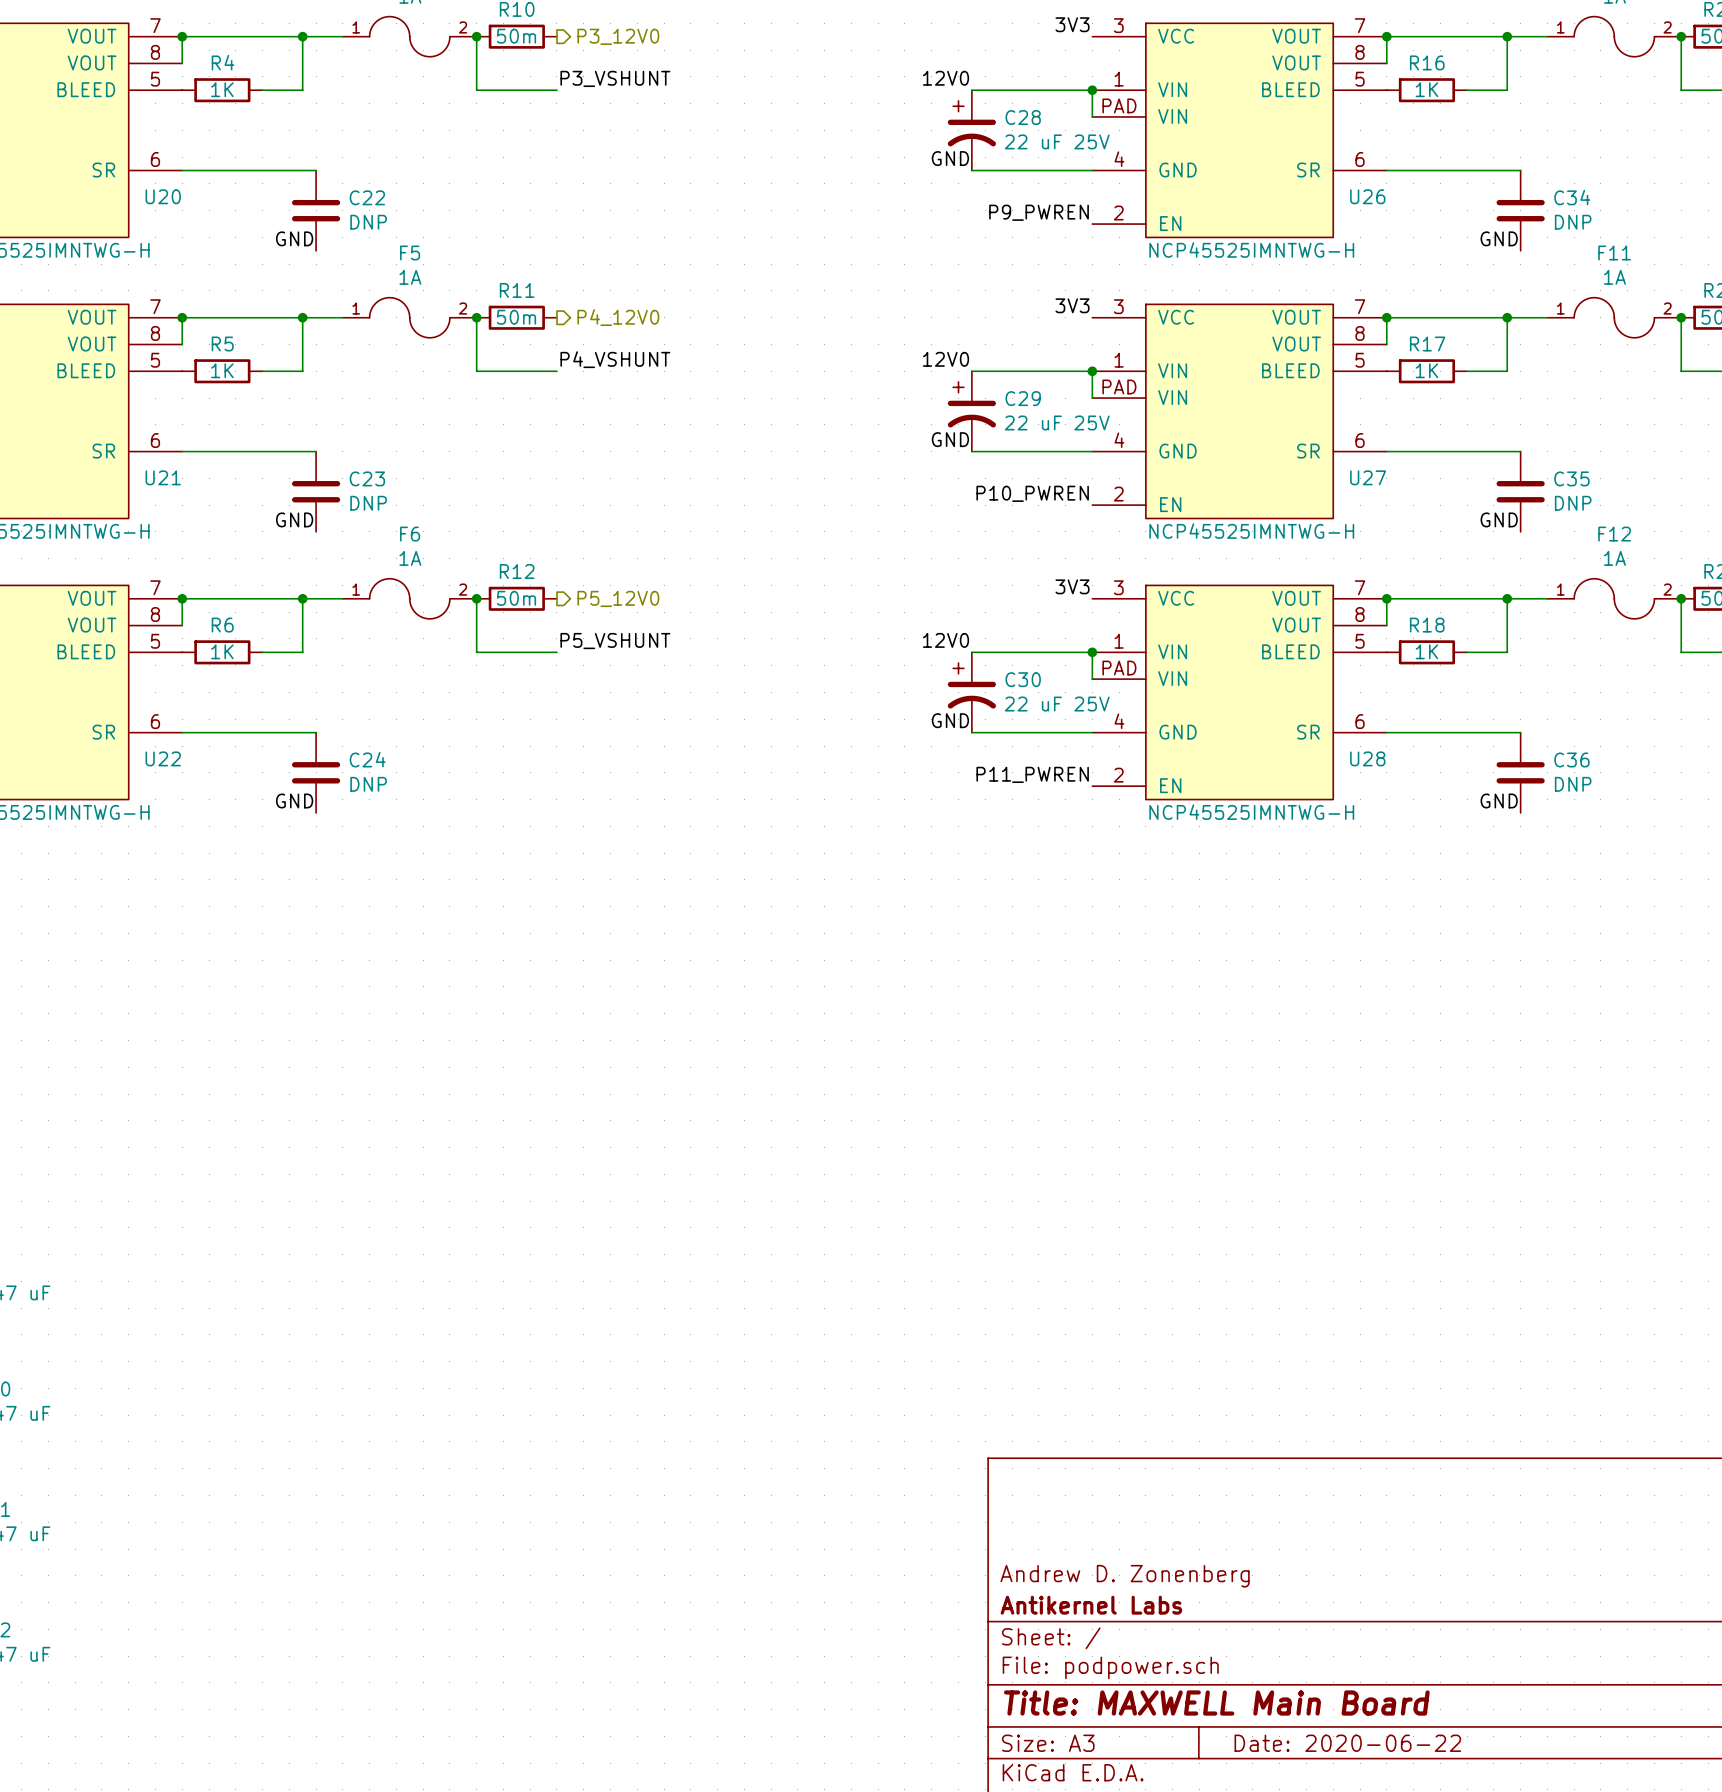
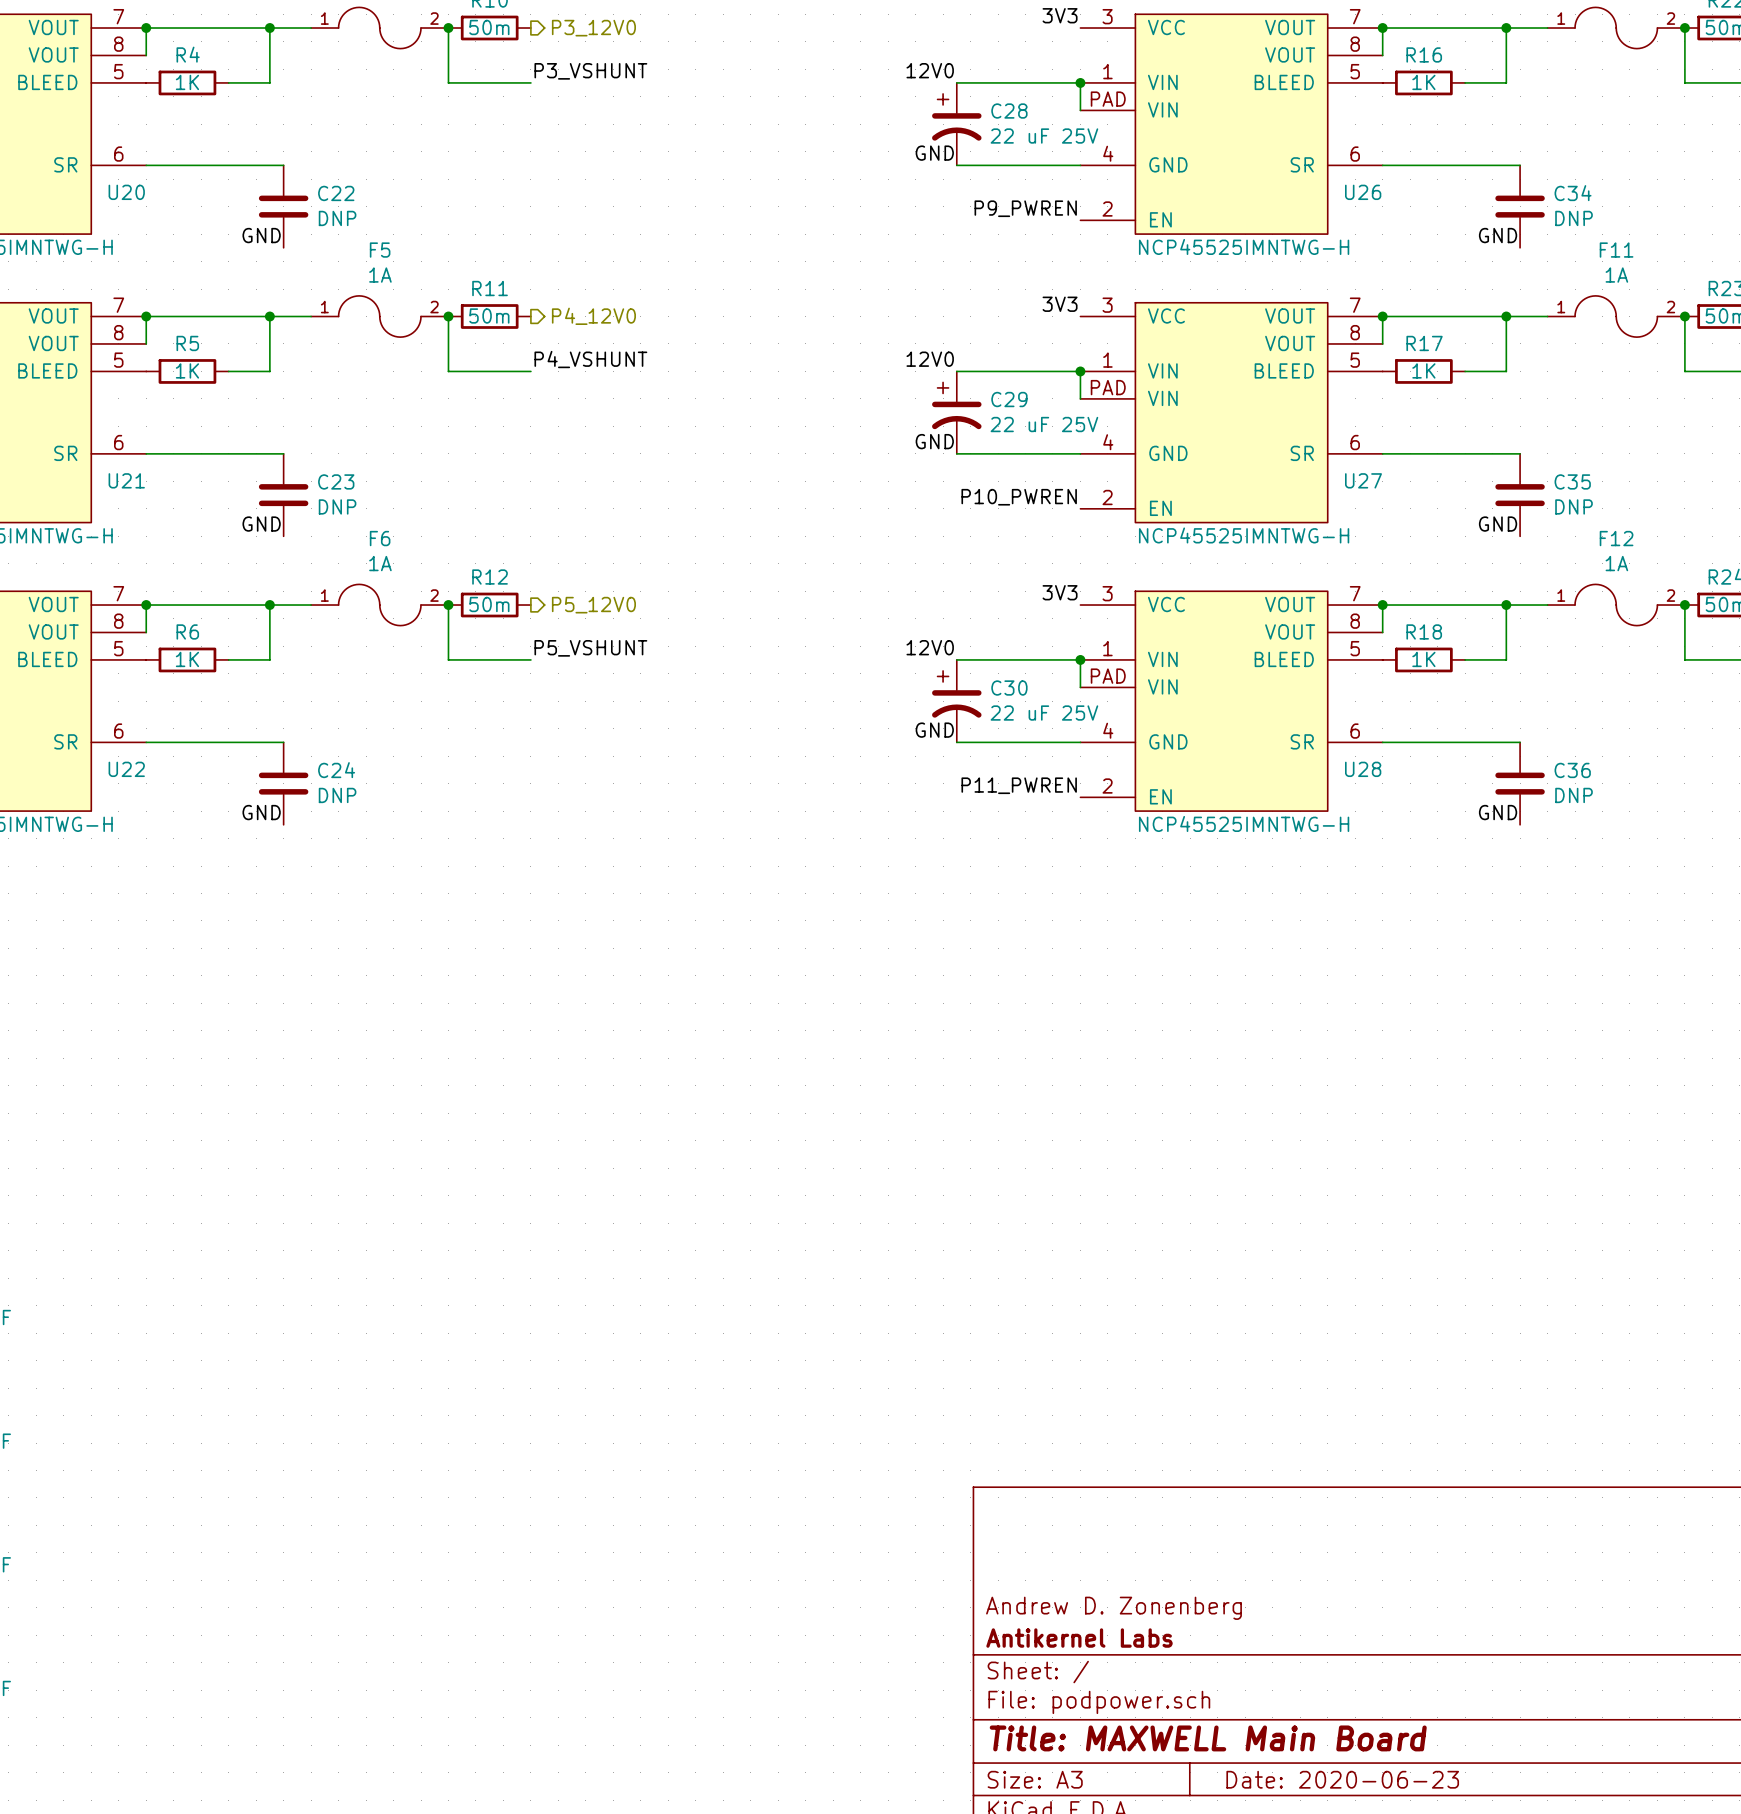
title block: Date: 2020-06-22 (1347, 1743) -> Date: 2020-06-23 (1342, 1779)

